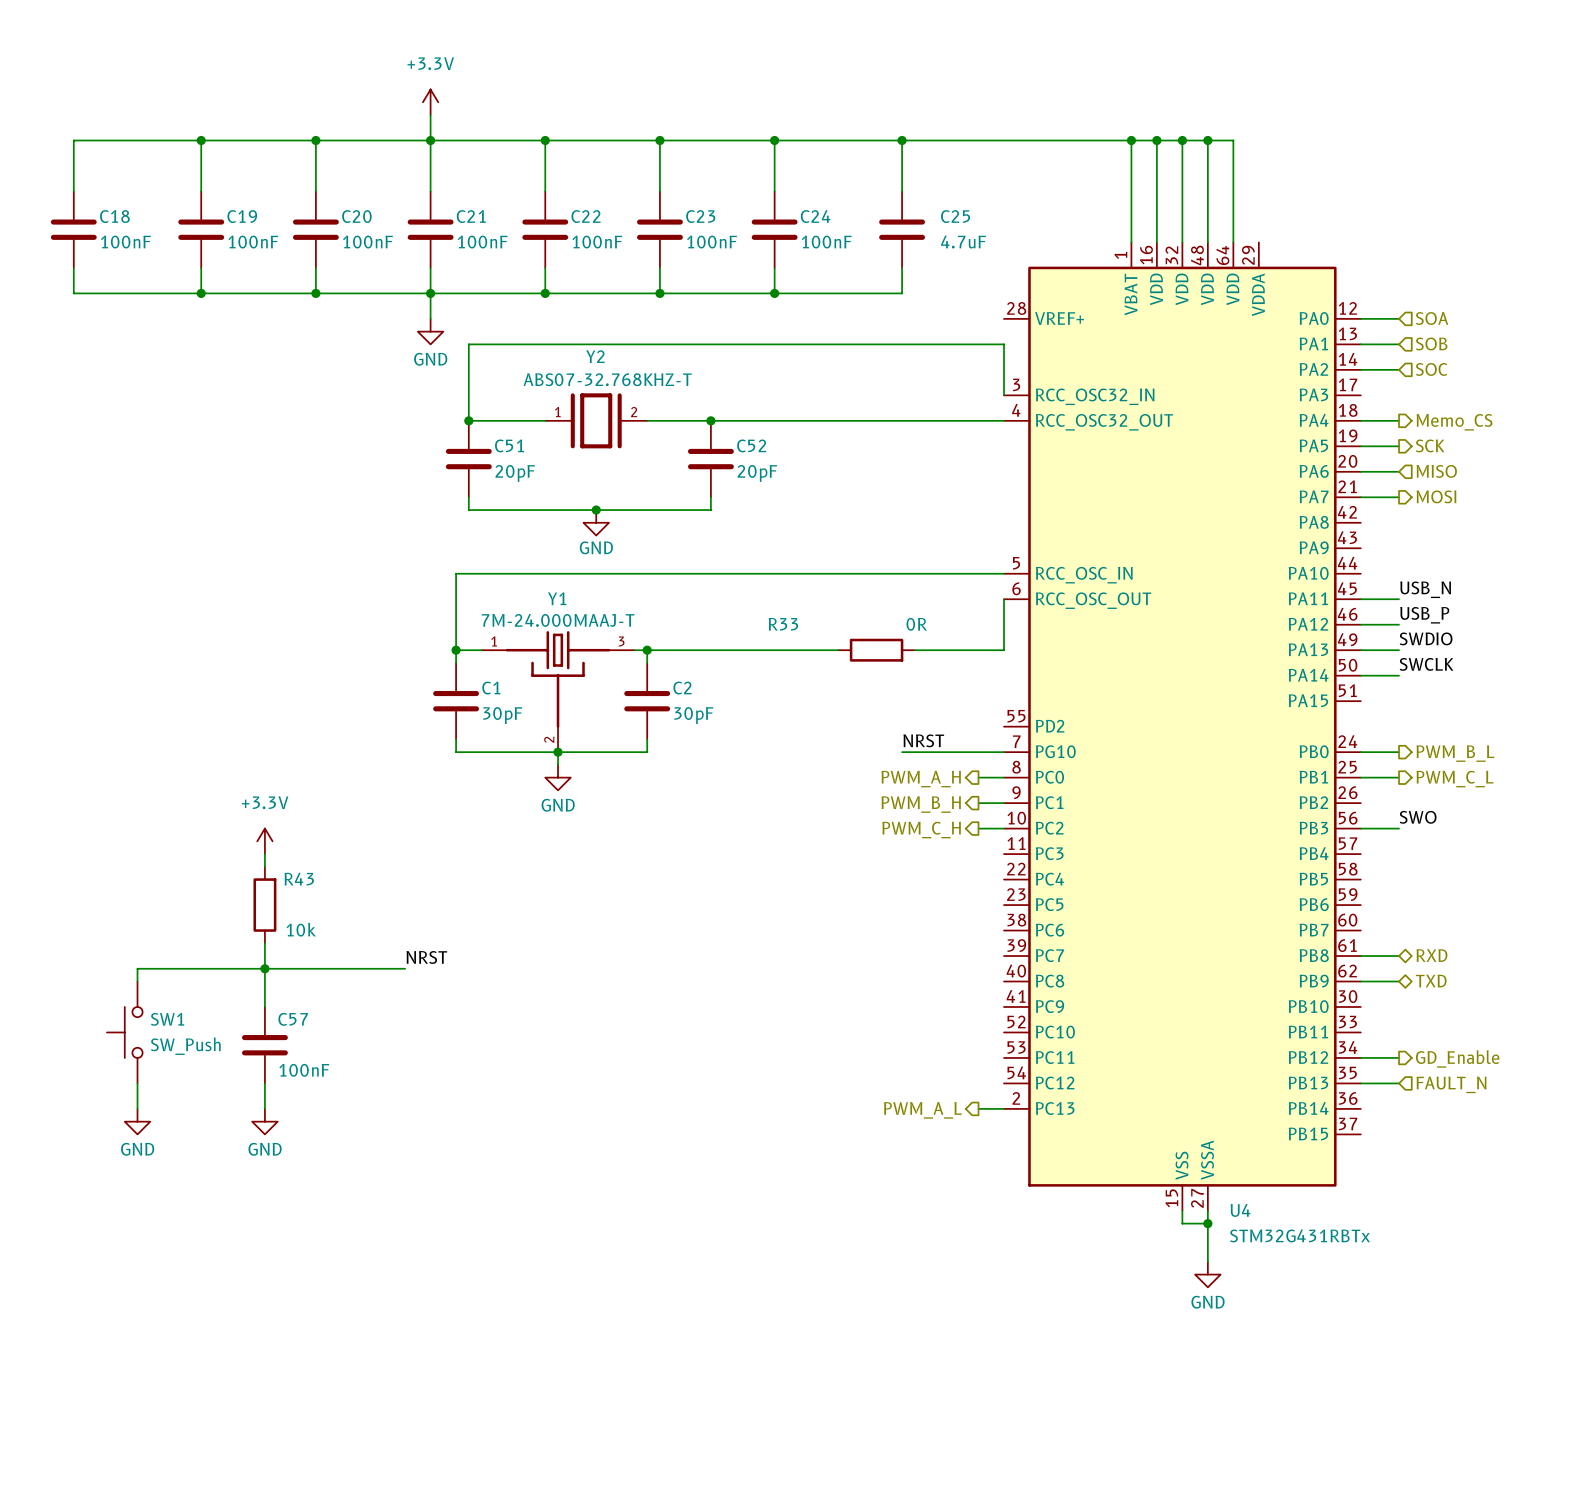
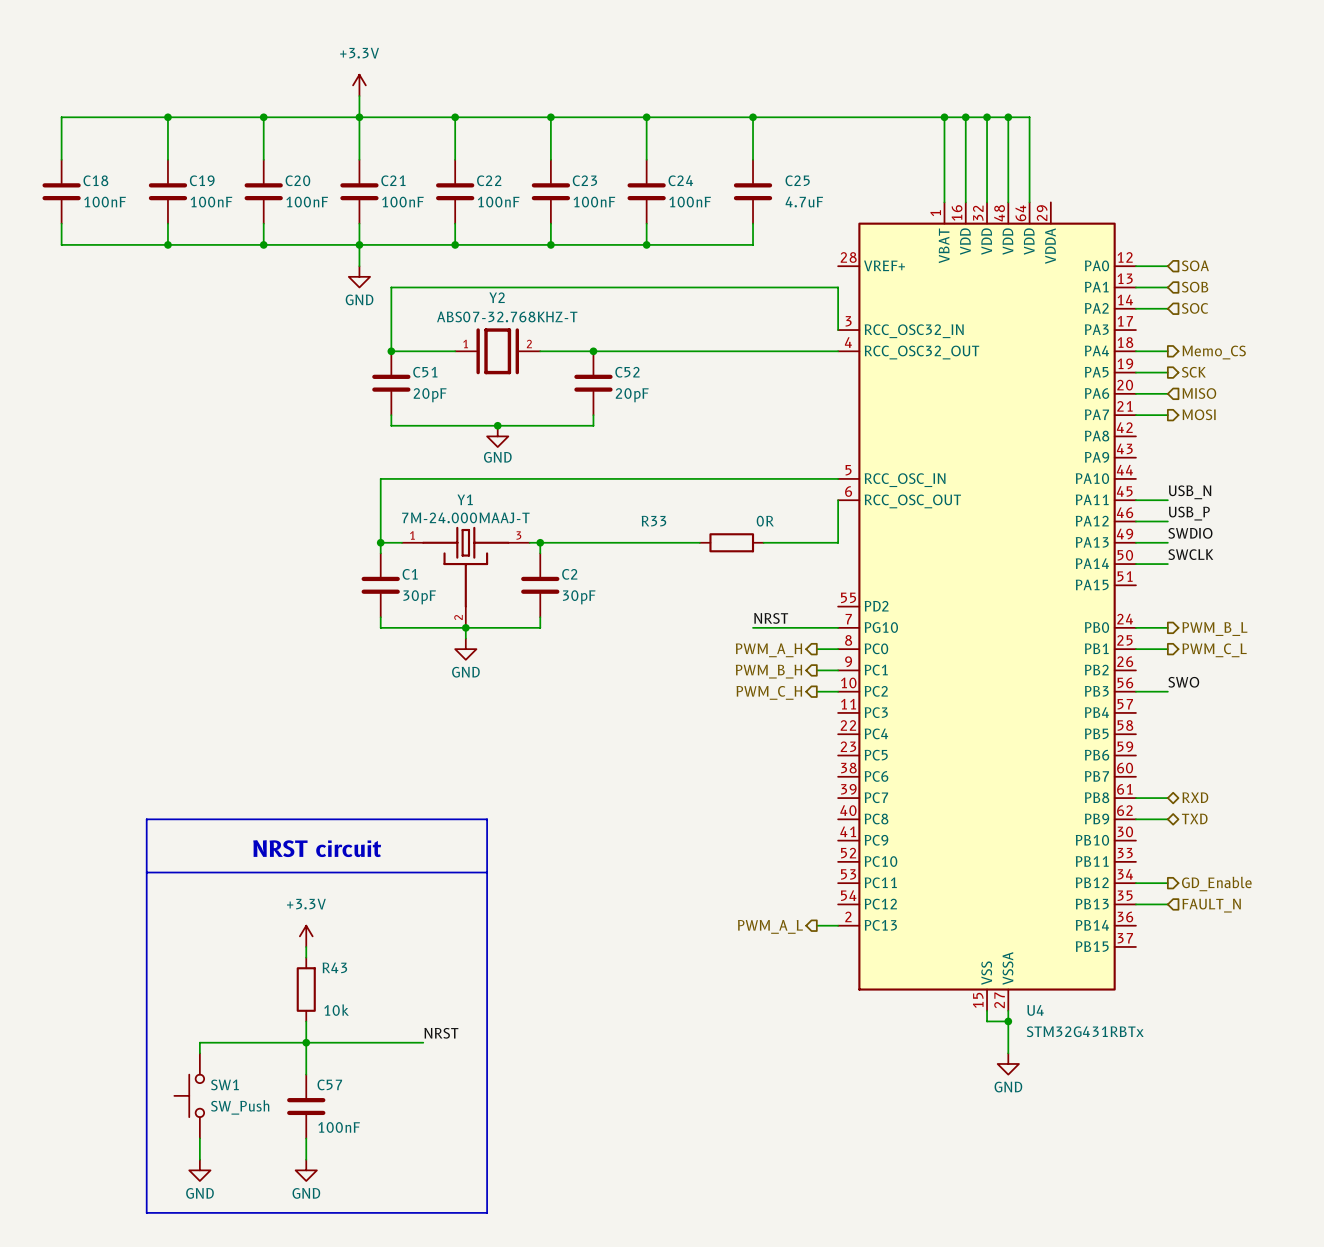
power symbol: +3.3V (264, 841) -> none
wire: (264, 854) (264, 866) -> none
R43 position: (264, 905) -> (306, 989)
wire: (264, 943) (264, 1006) -> none
label: NRST (426, 957) -> none
junction: (264, 968) -> none
wire: (405, 968) (137, 968) (137, 981) -> none
line: none -> (146, 819) (487, 819) (487, 1212) (146, 1212) (146, 819)
text: none -> NRST circuit (317, 848)
SW1 position: (124, 1032) -> (189, 1095)
line: none -> (146, 872) (487, 872)
C57 position: (264, 1045) -> (306, 1106)
wire: (137, 1083) (137, 1108) -> none
wire: (264, 1083) (264, 1108) -> none
power symbol: GND (137, 1121) -> none
power symbol: GND (264, 1121) -> none
power symbol: none -> +3.3V (306, 936)
wire: none -> (306, 946) (306, 957)
wire: none -> (306, 1021) (306, 1074)
label: none -> NRST (441, 1033)
junction: none -> (306, 1042)
wire: none -> (423, 1042) (199, 1042) (199, 1053)
wire: none -> (199, 1138) (199, 1159)
wire: none -> (306, 1138) (306, 1159)
power symbol: none -> GND (199, 1170)
power symbol: none -> GND (306, 1170)

